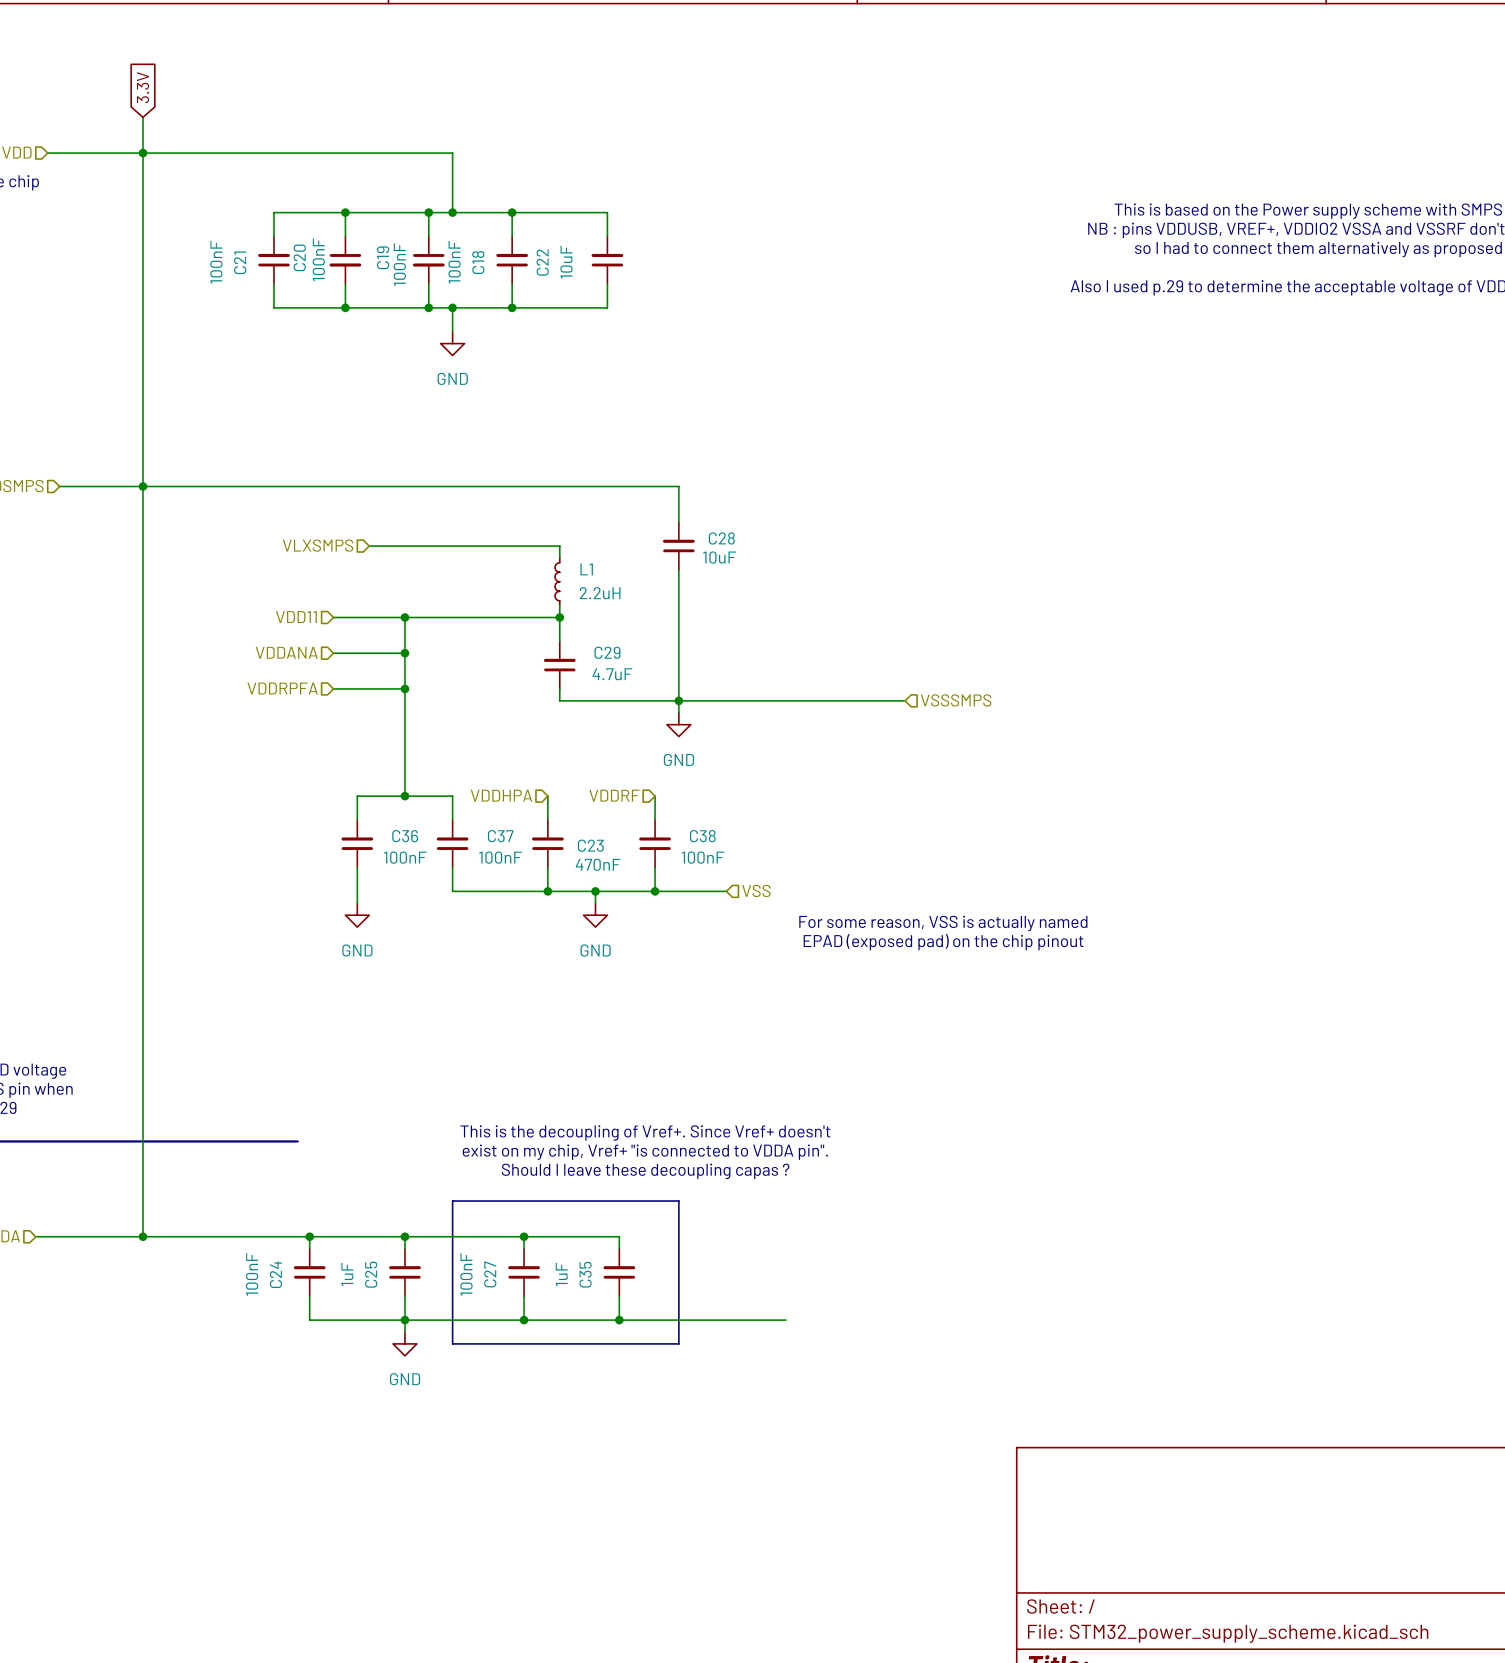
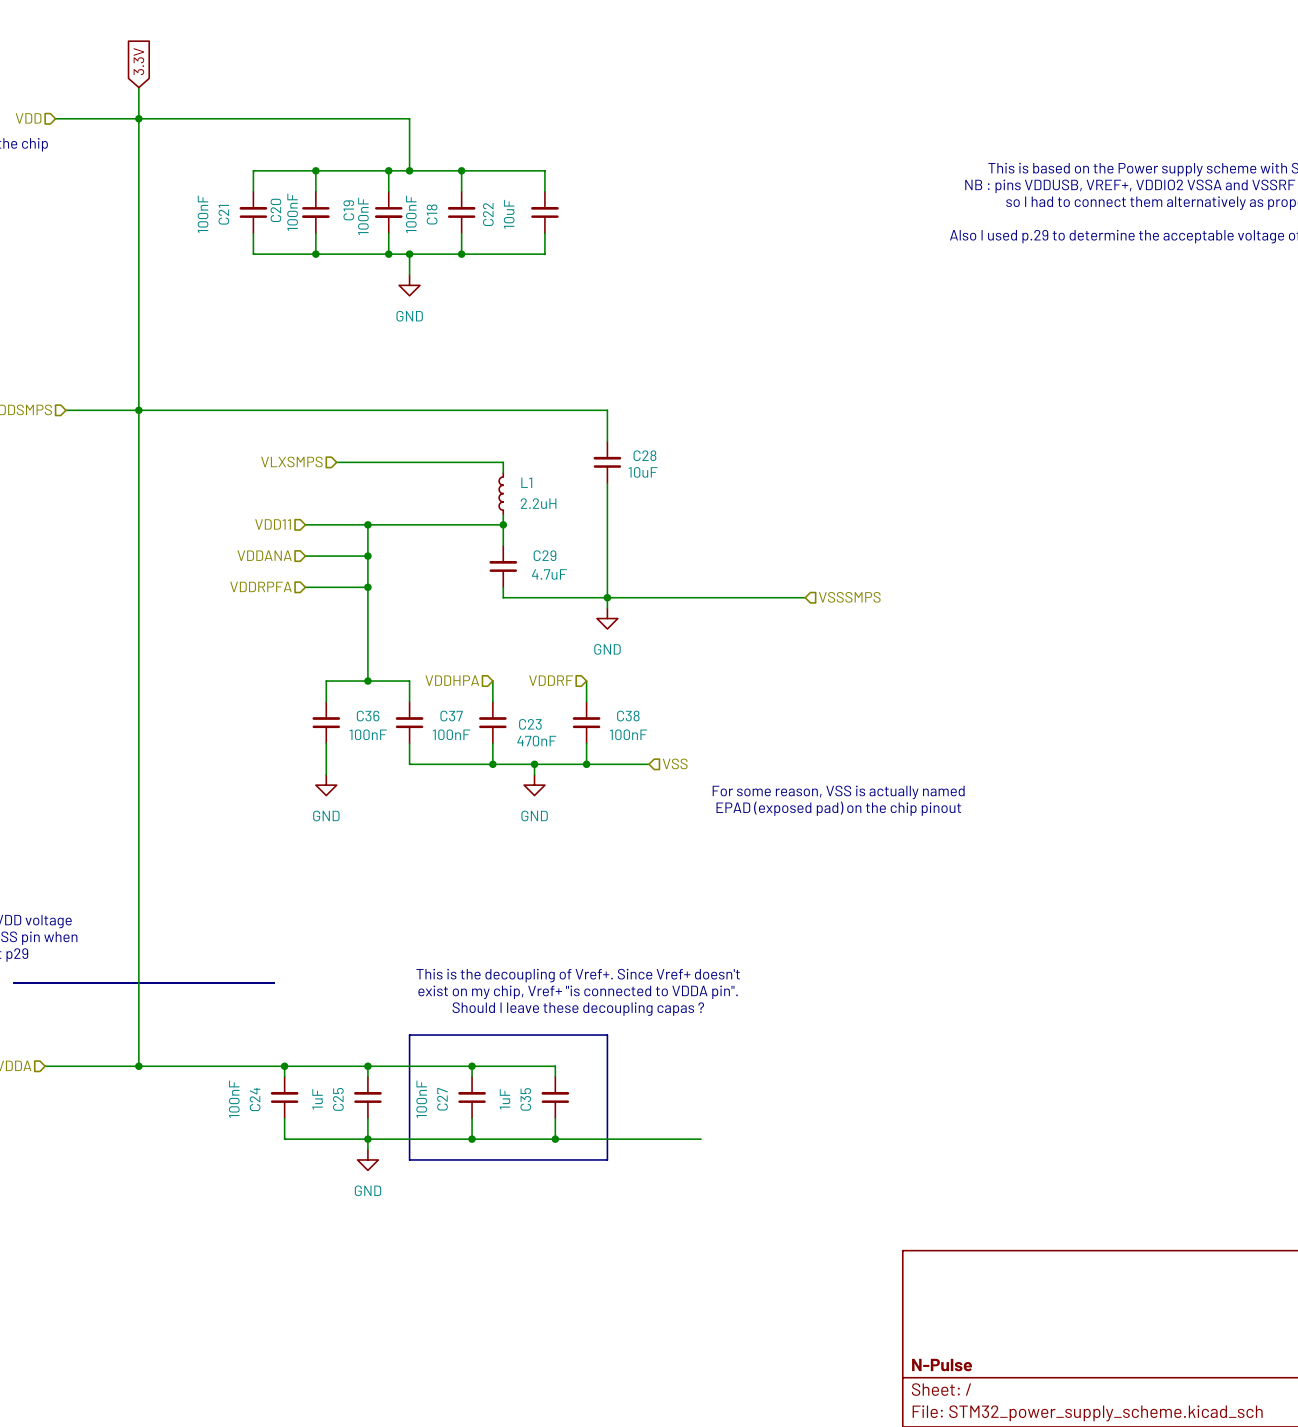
title block: none -> N-Pulse (942, 1365)

